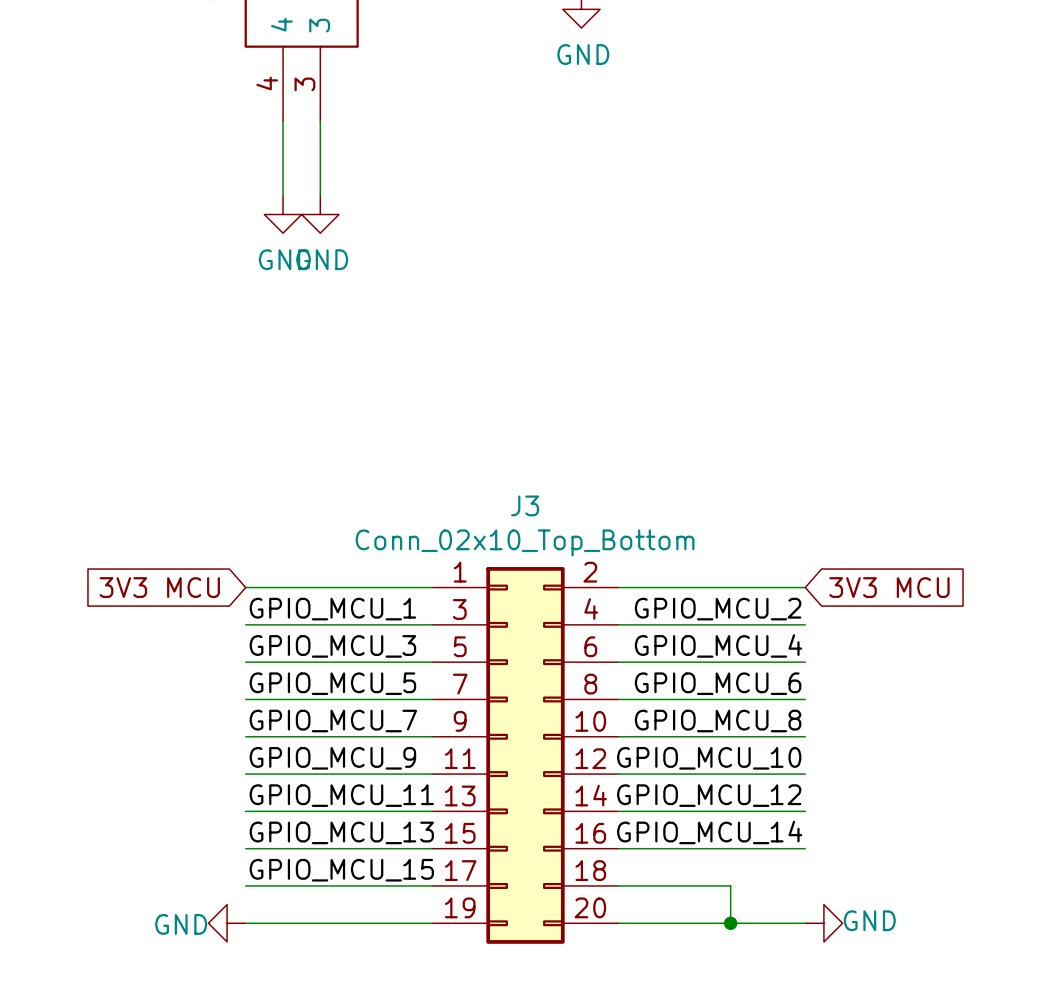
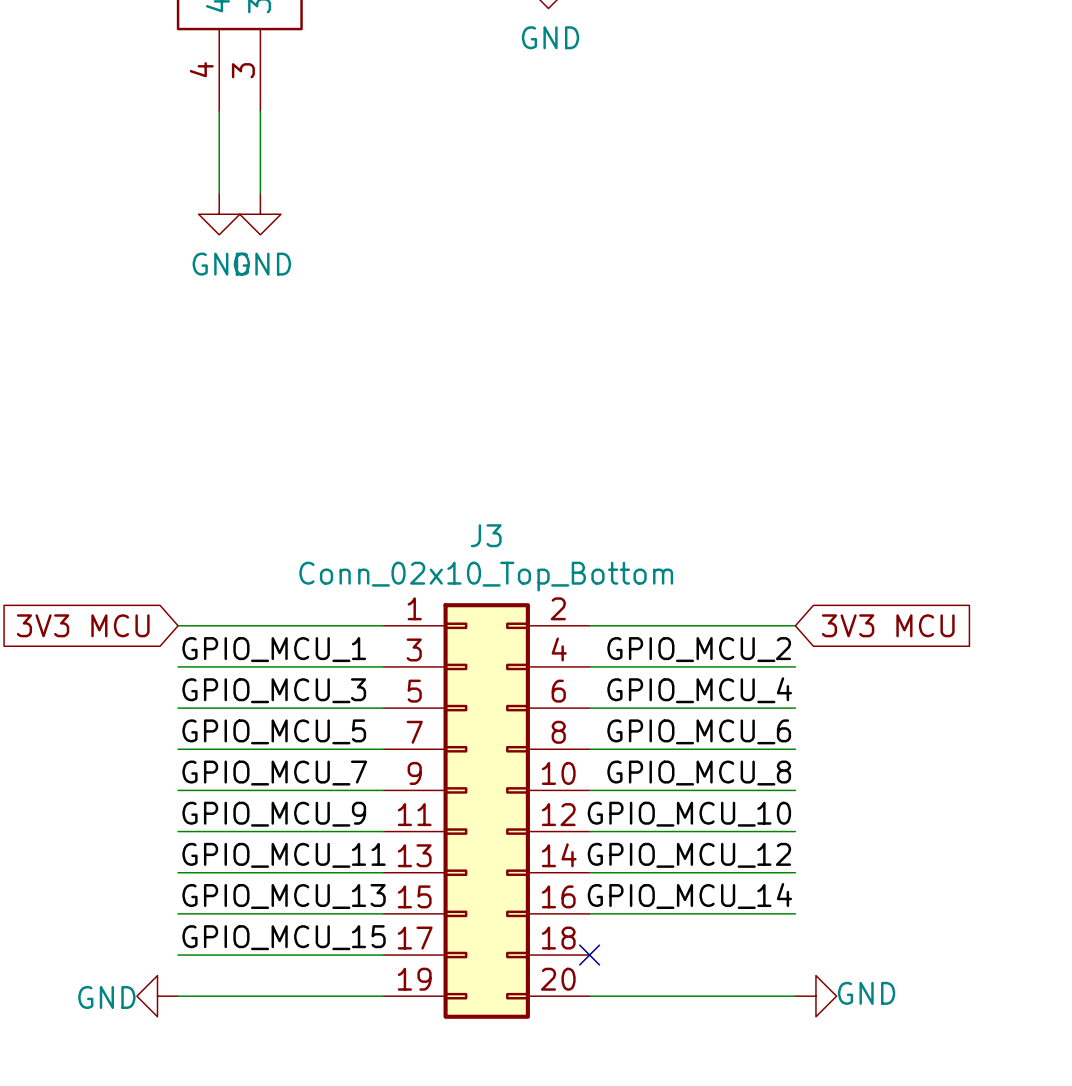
wire: (618, 885) (730, 885) (730, 923) -> none
no-connect mark: none -> (589, 955)
junction: (730, 923) -> none

